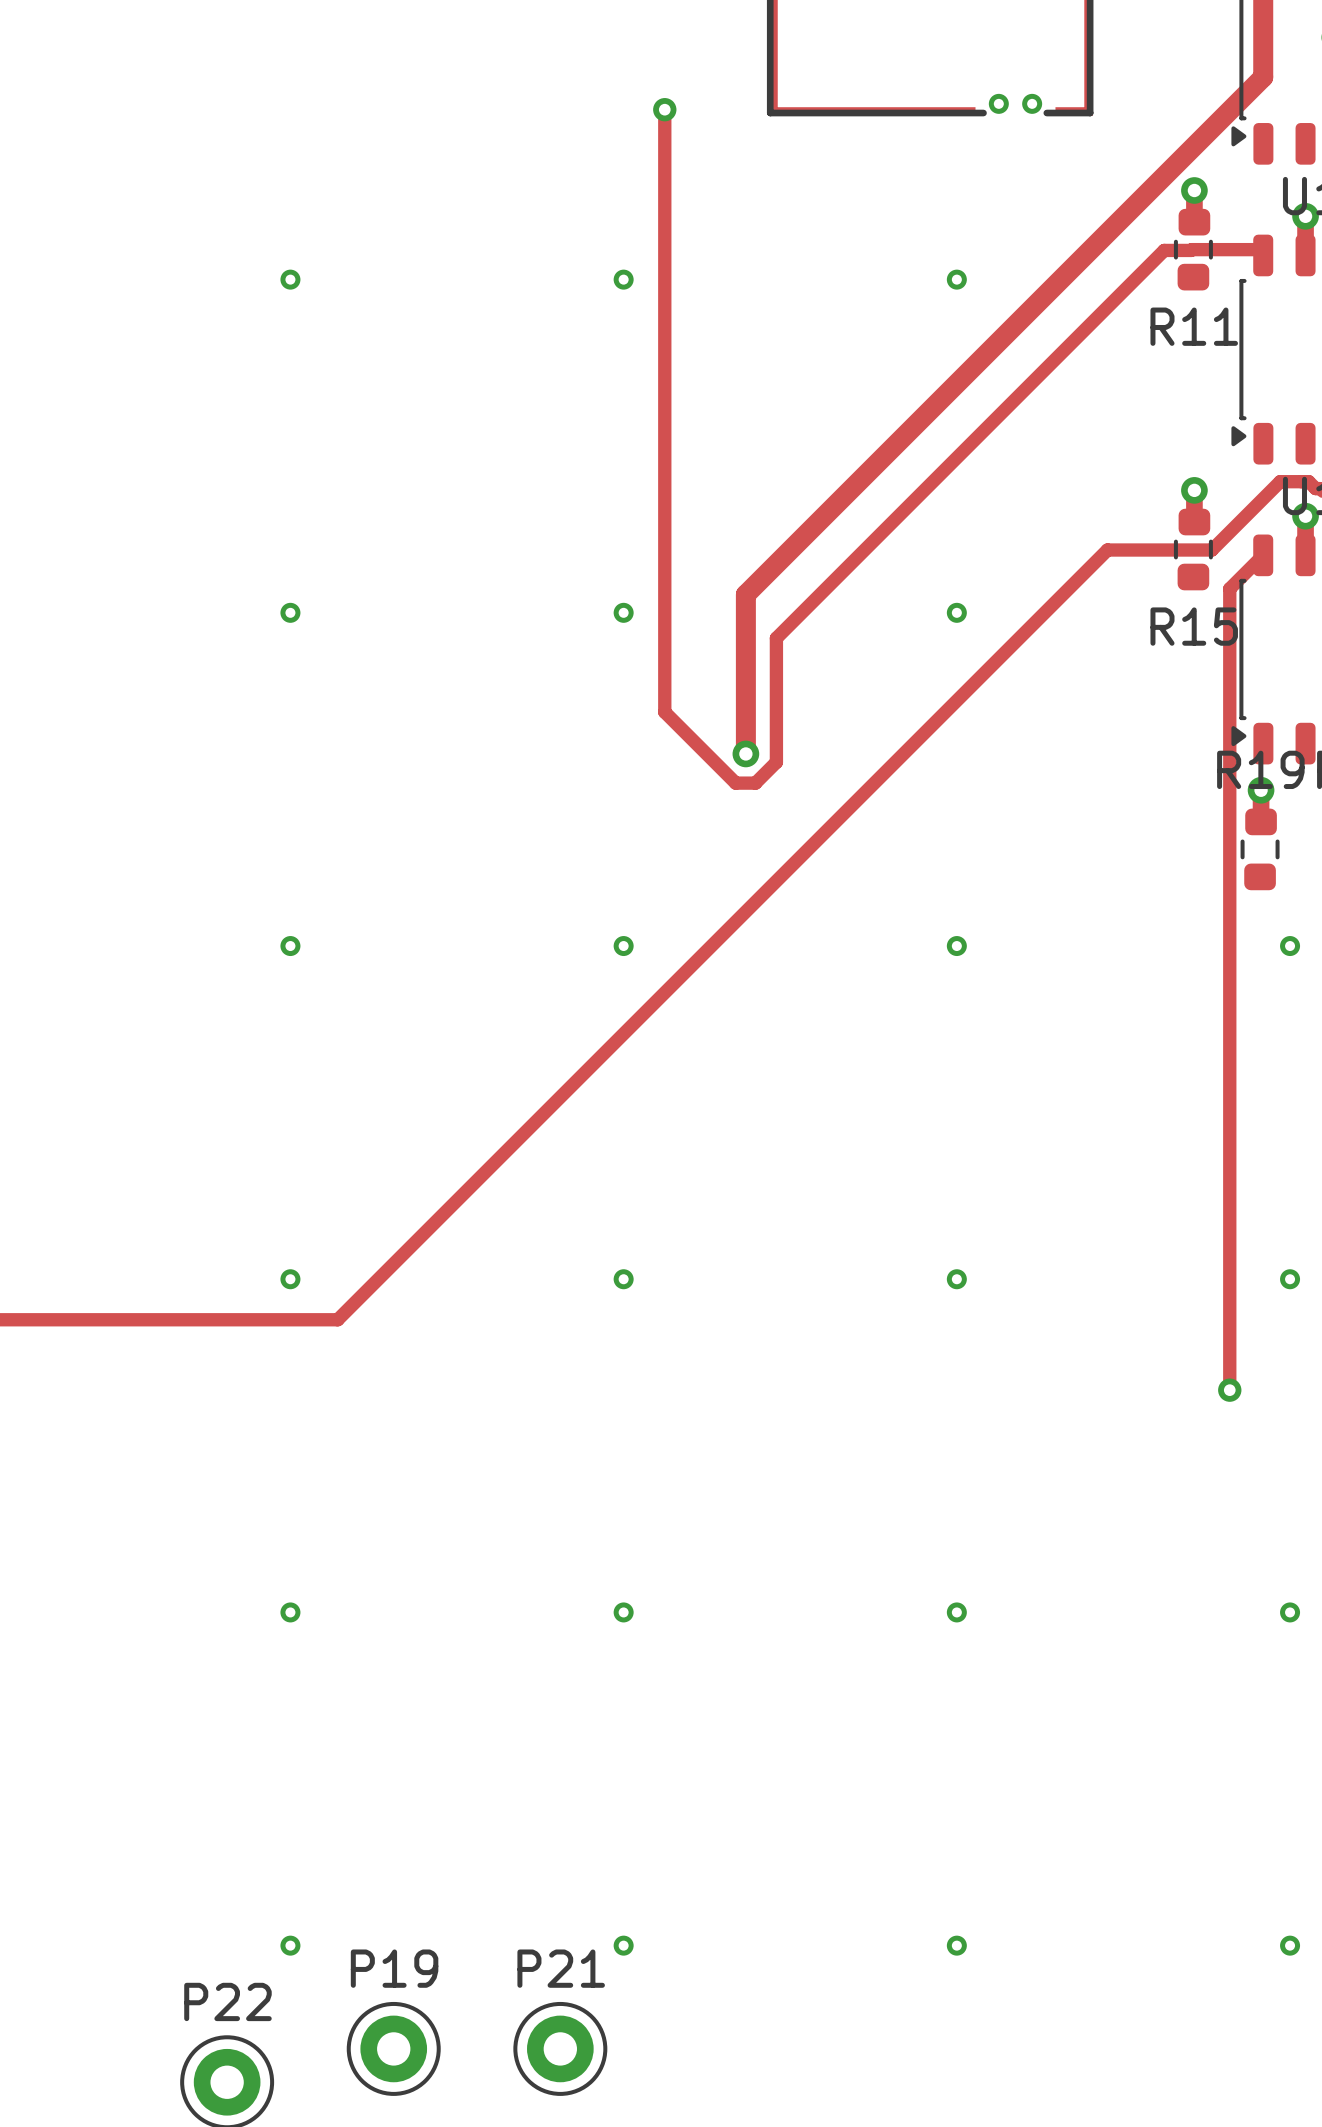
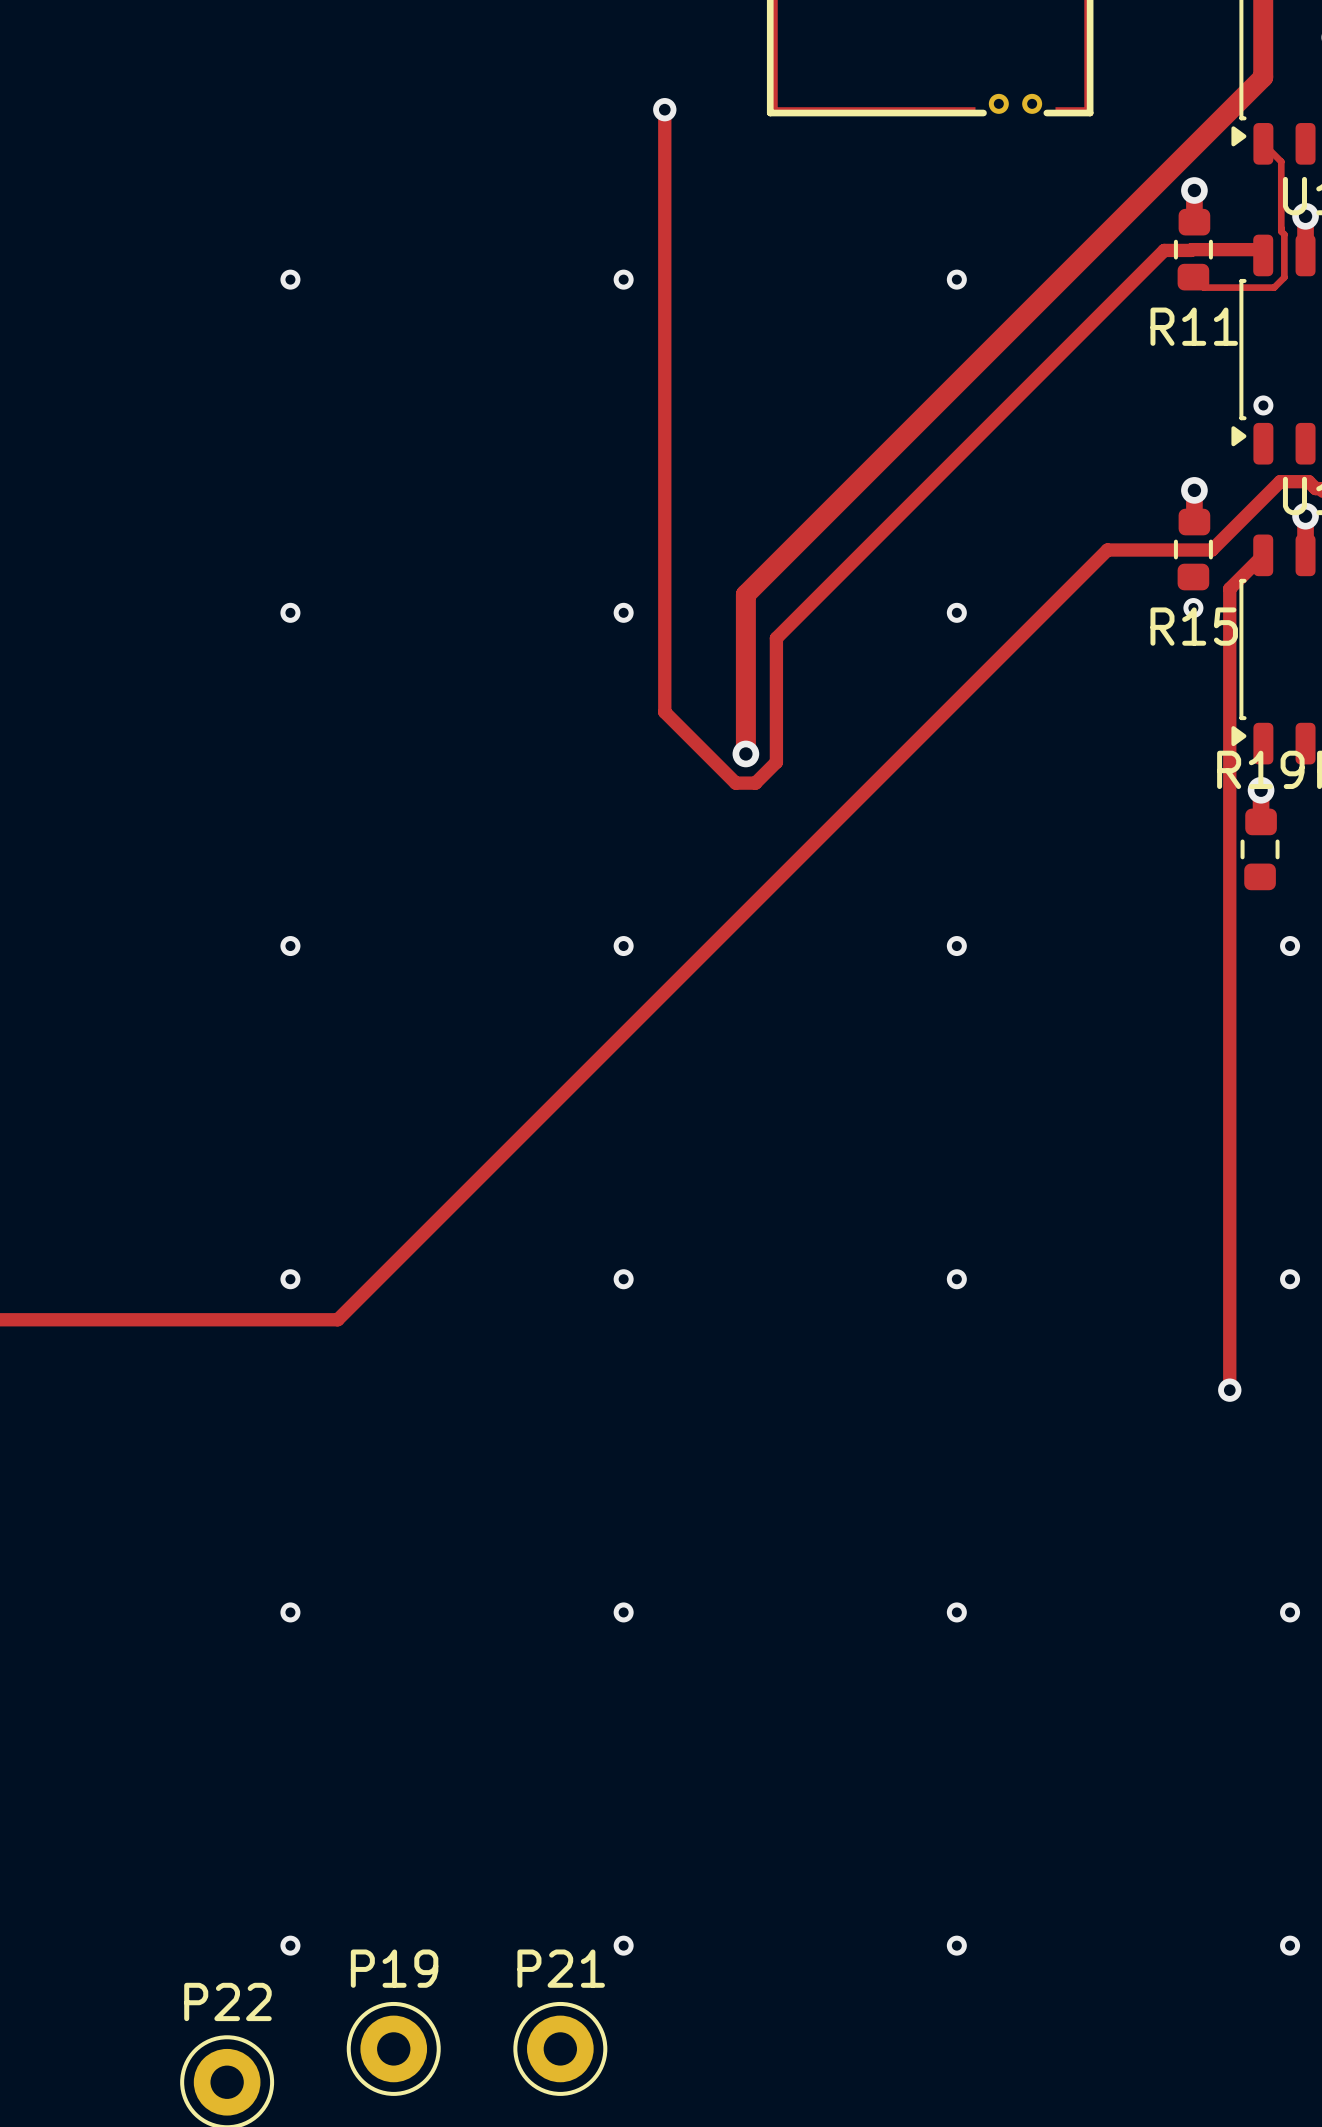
track: none -> (1263, 143) (1281, 161) (1281, 231) (1284, 234) (1284, 277) (1274, 287) (1203, 287) (1193, 277)
via: none -> (1263, 405)
via: none -> (1193, 608)

